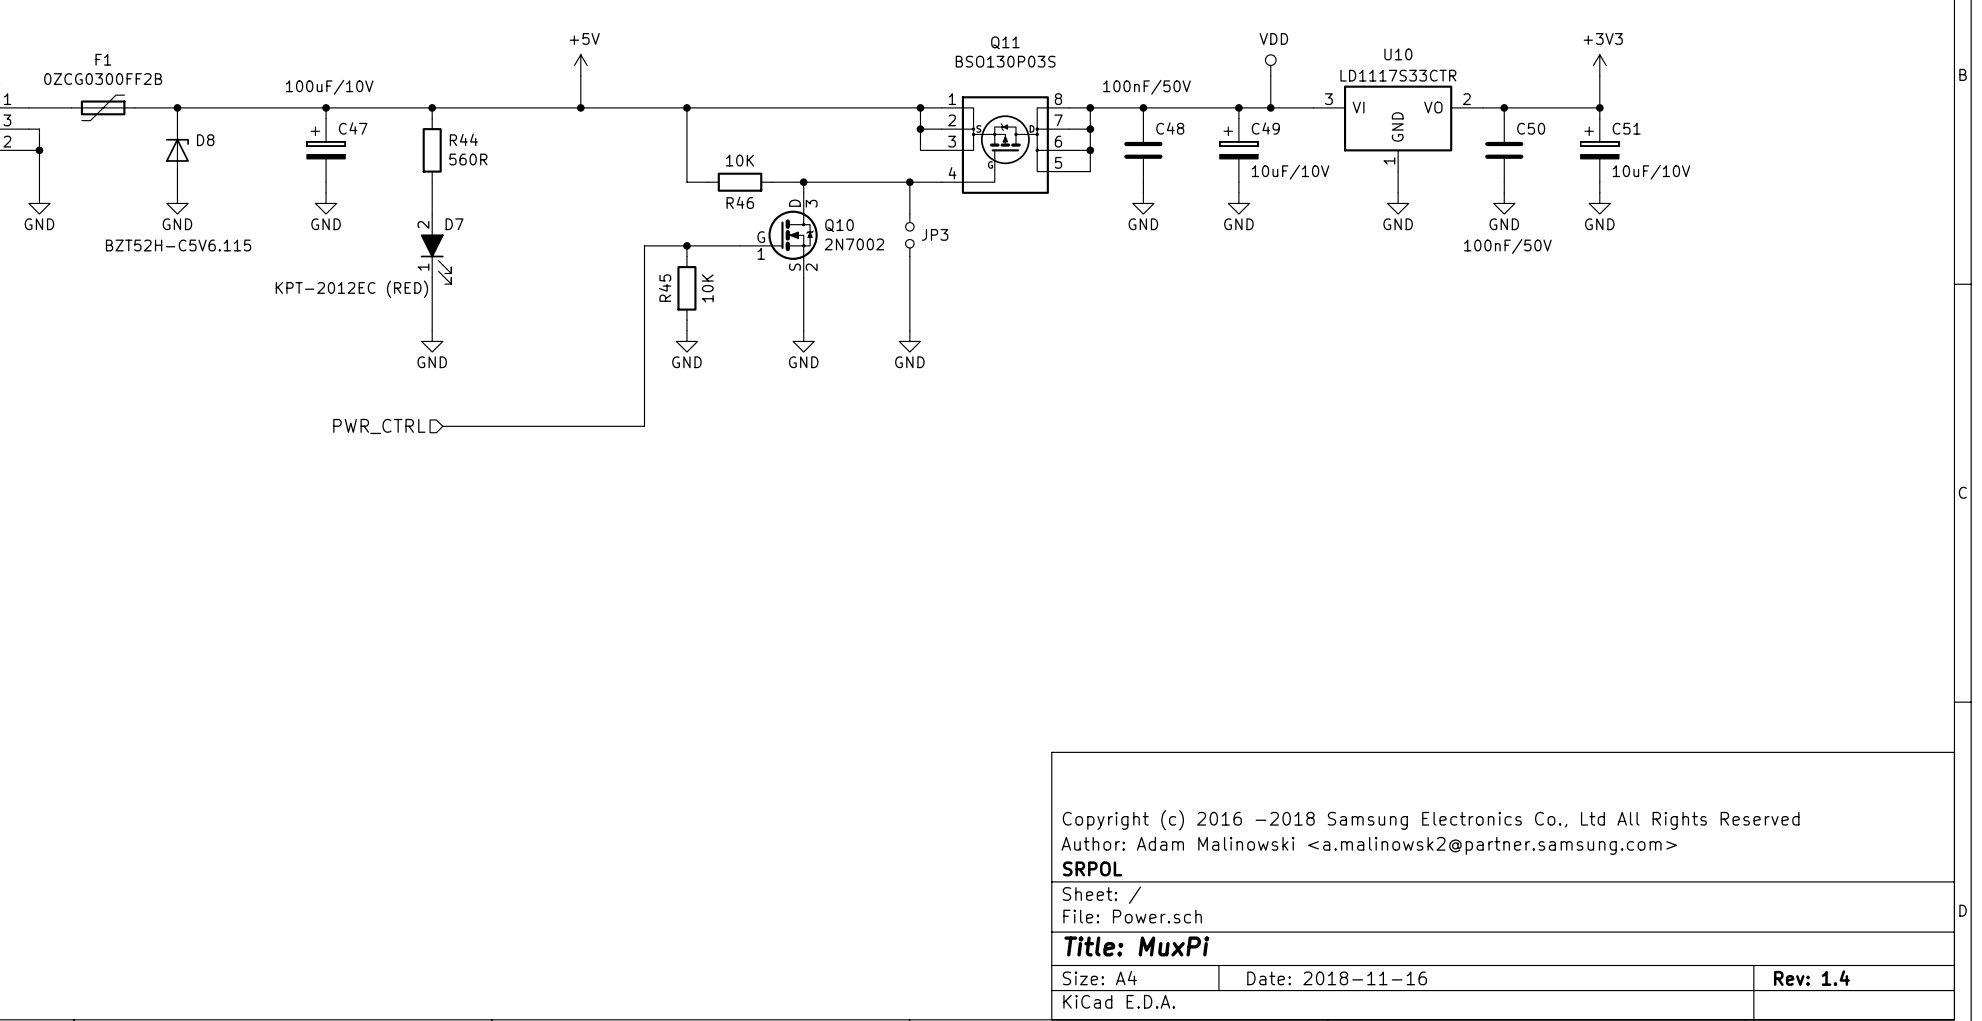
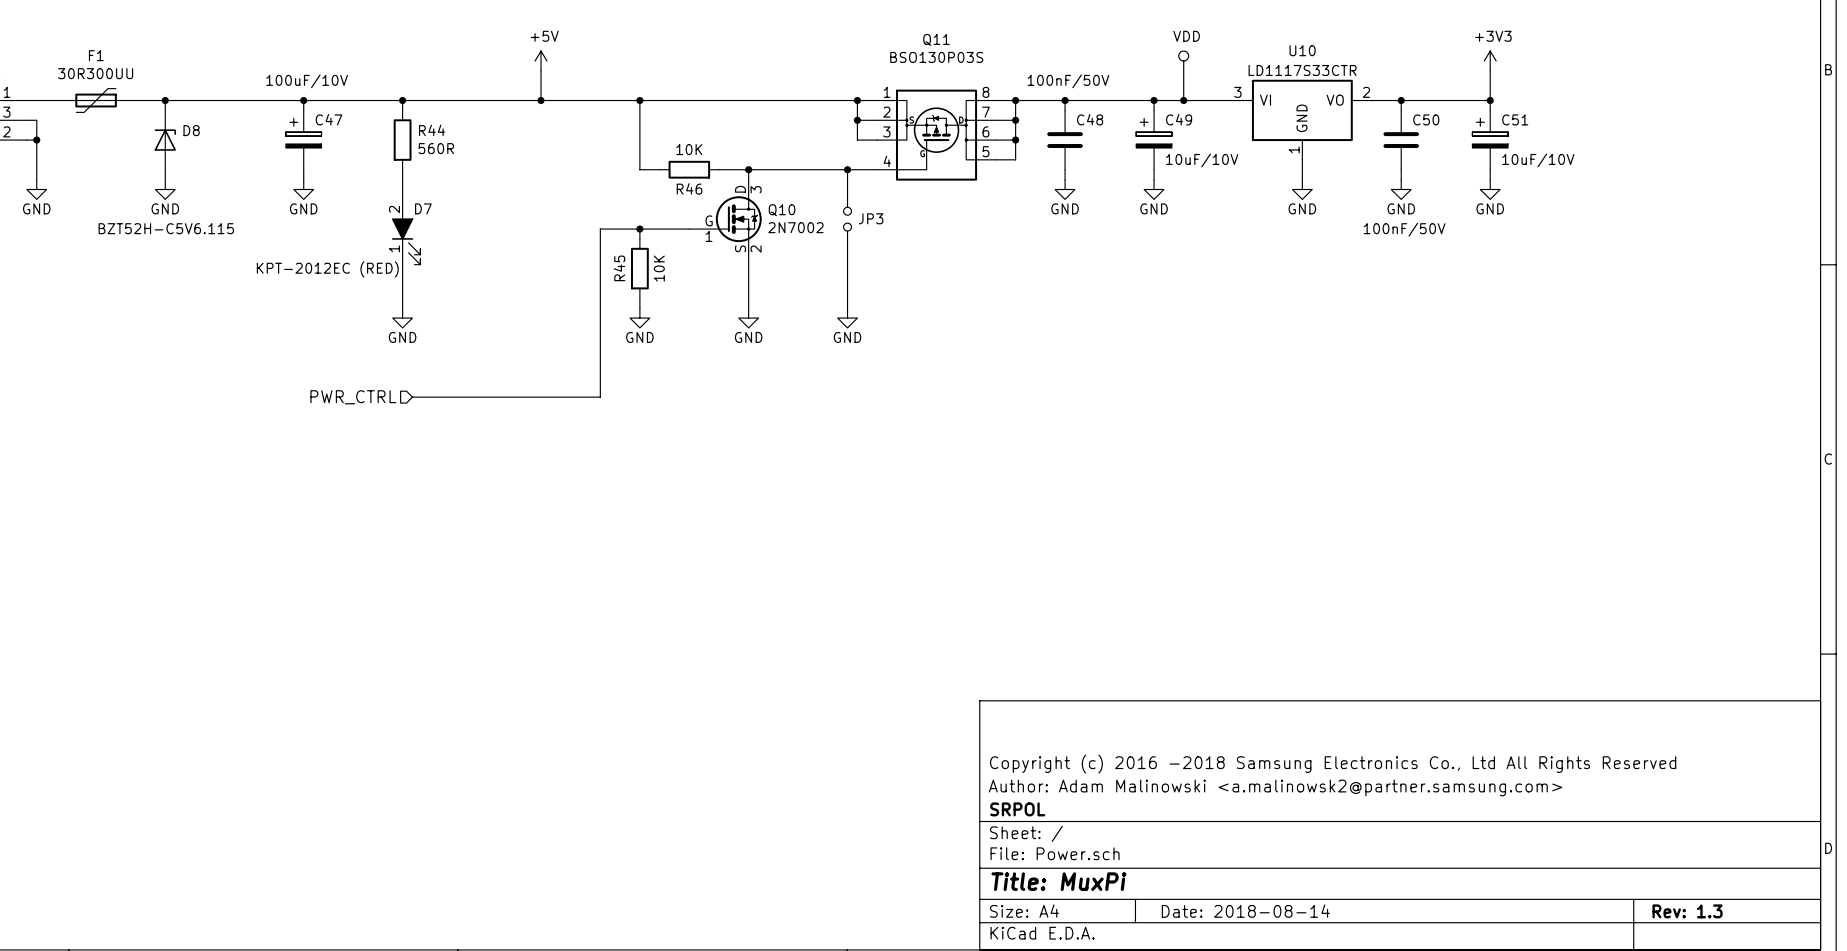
F1 value: 0ZCG0300FF2B (103, 79) -> 30R300UU (95, 73)
title block: Date: 2018-11-16 (1337, 978) -> Date: 2018-08-14 (1245, 911)
title block: Rev: 1.4 (1811, 978) -> Rev: 1.3 (1687, 911)

